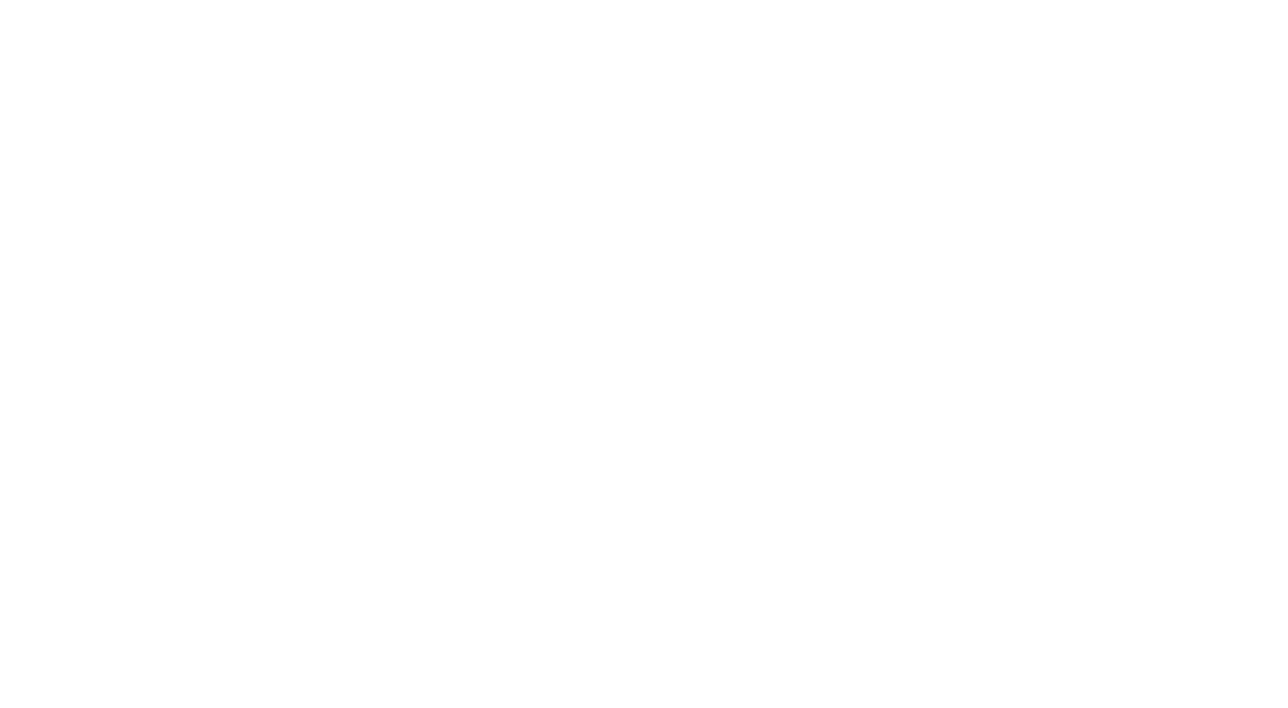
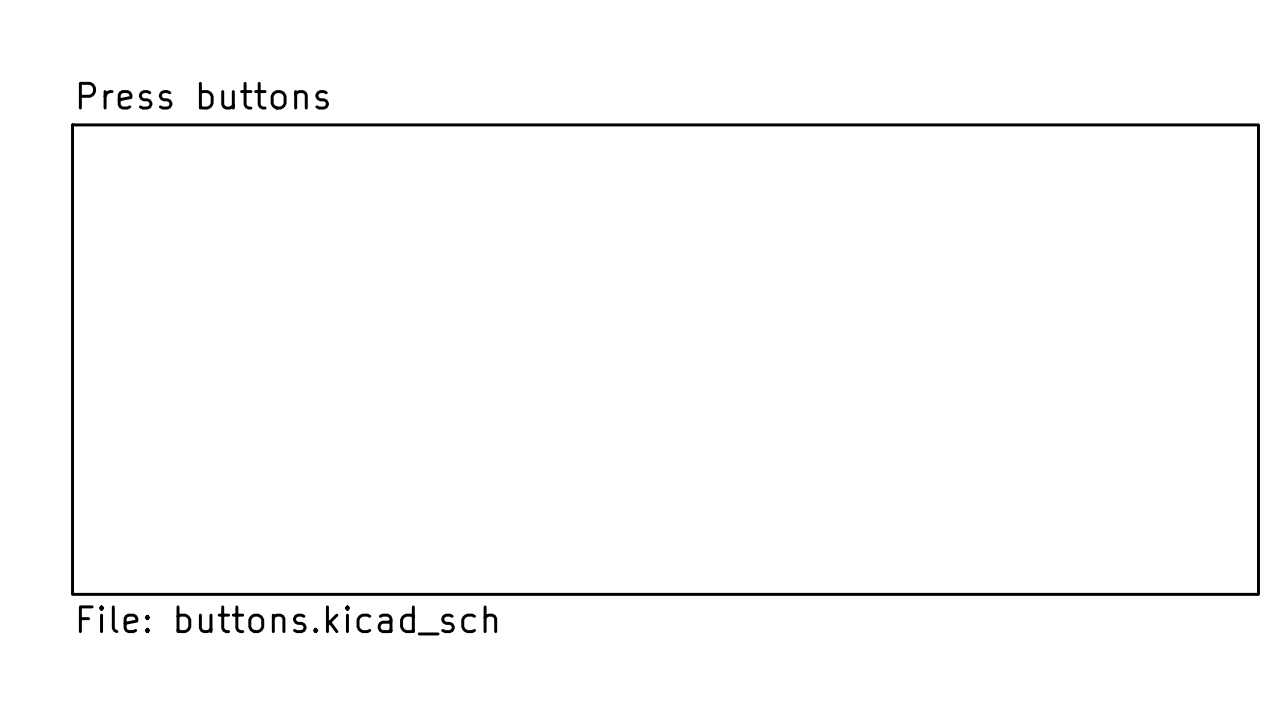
sheet Press buttons: none -> File: buttons.kicad_sch (665, 359)

